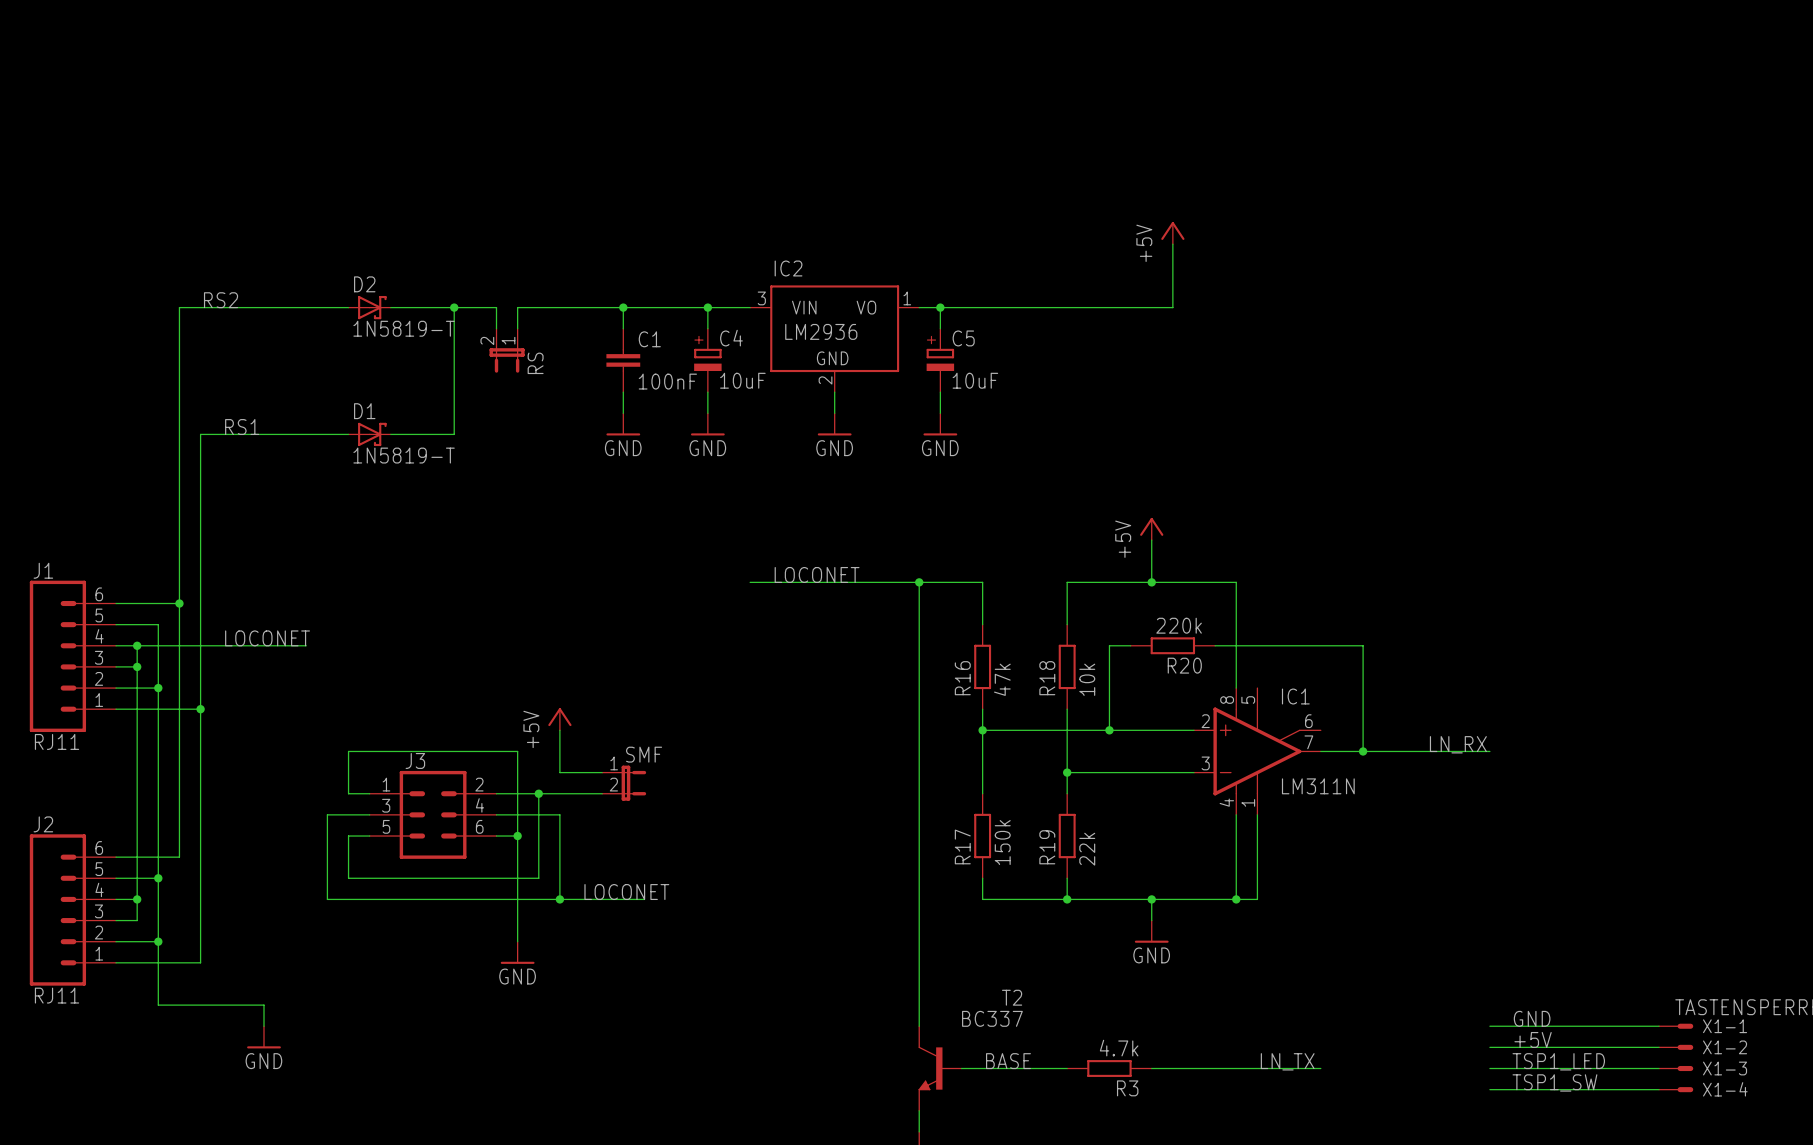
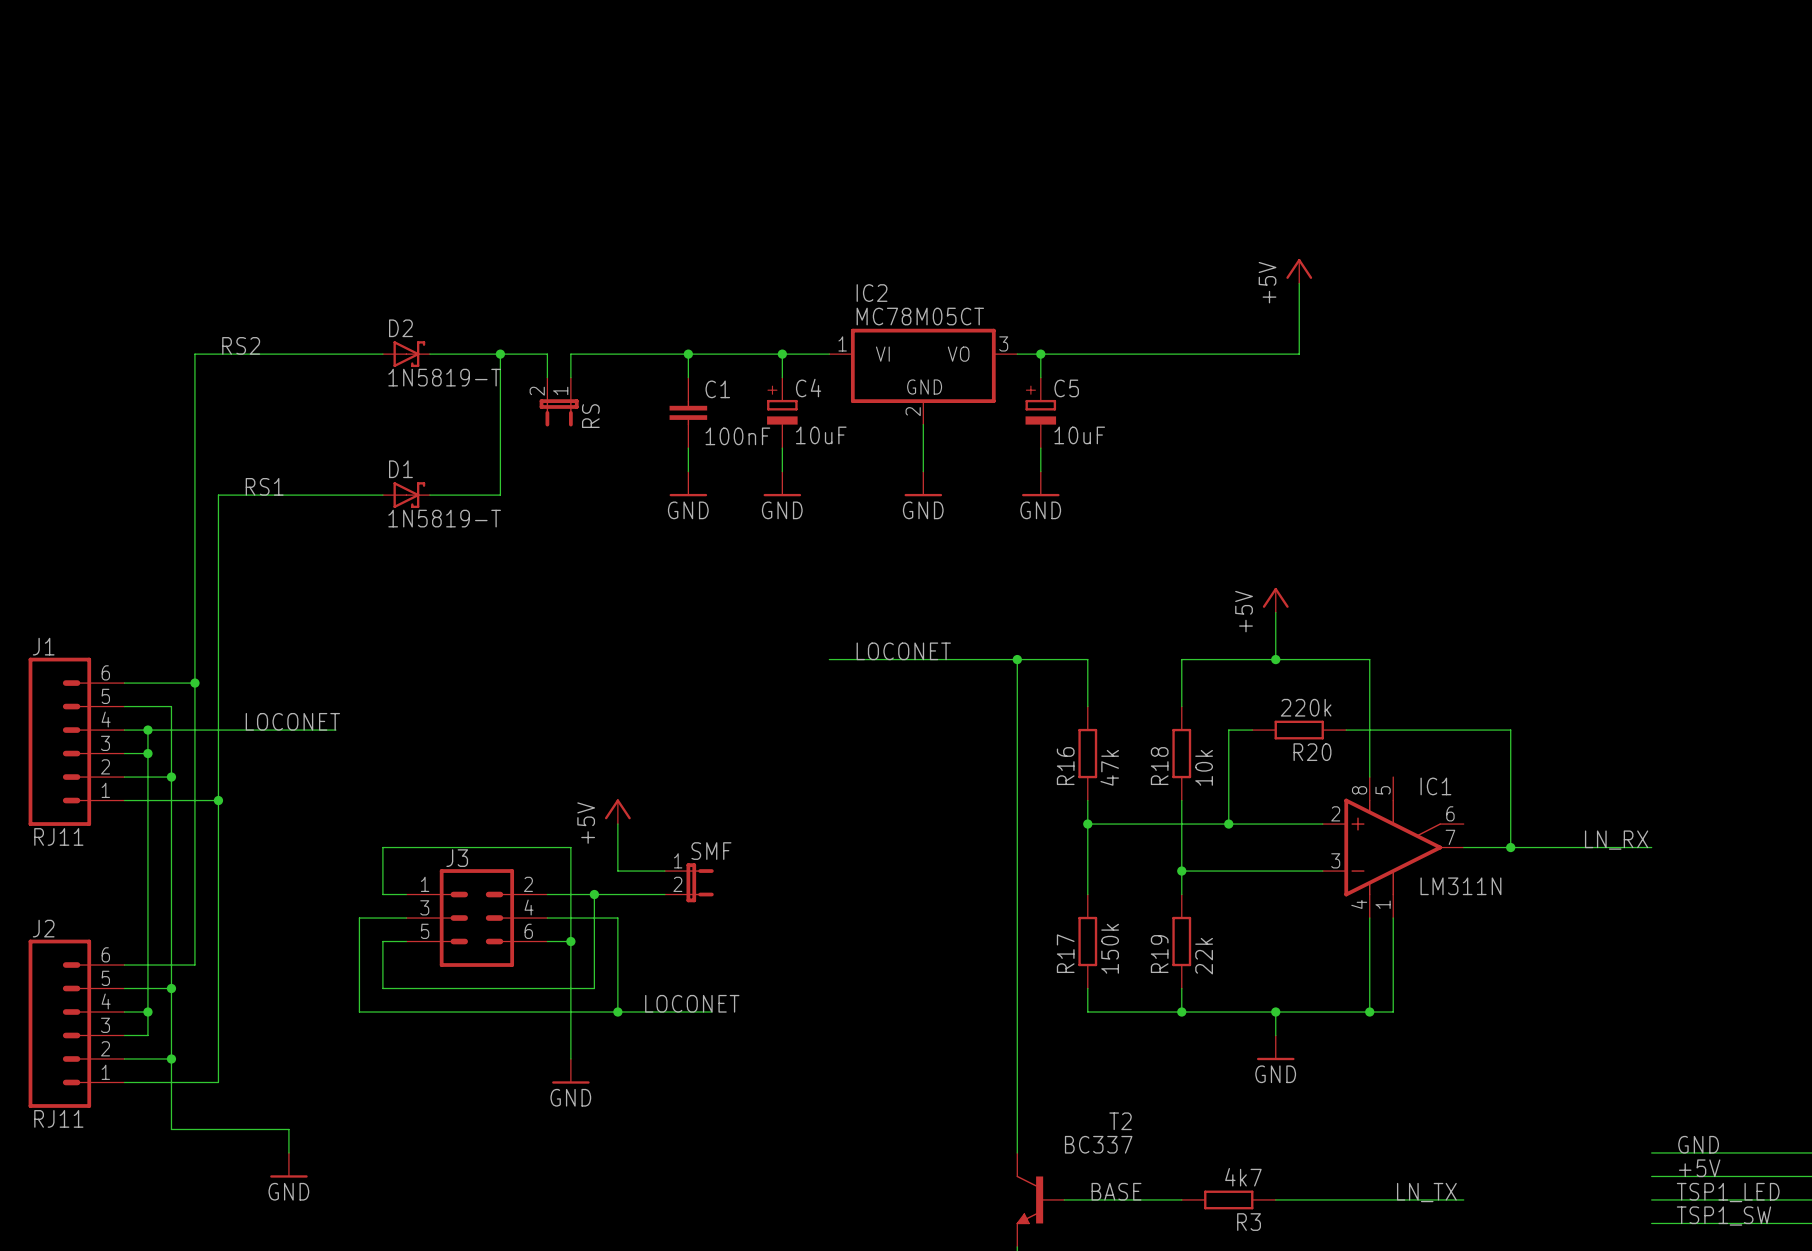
IC2 symbol: [750, 285, 920, 393] -> [829, 328, 1018, 425]
IC2 value: LM2936 (821, 331) -> MC78M05CT (920, 316)
R3 value: 4.7k (1119, 1048) -> 4k7 (1243, 1177)

